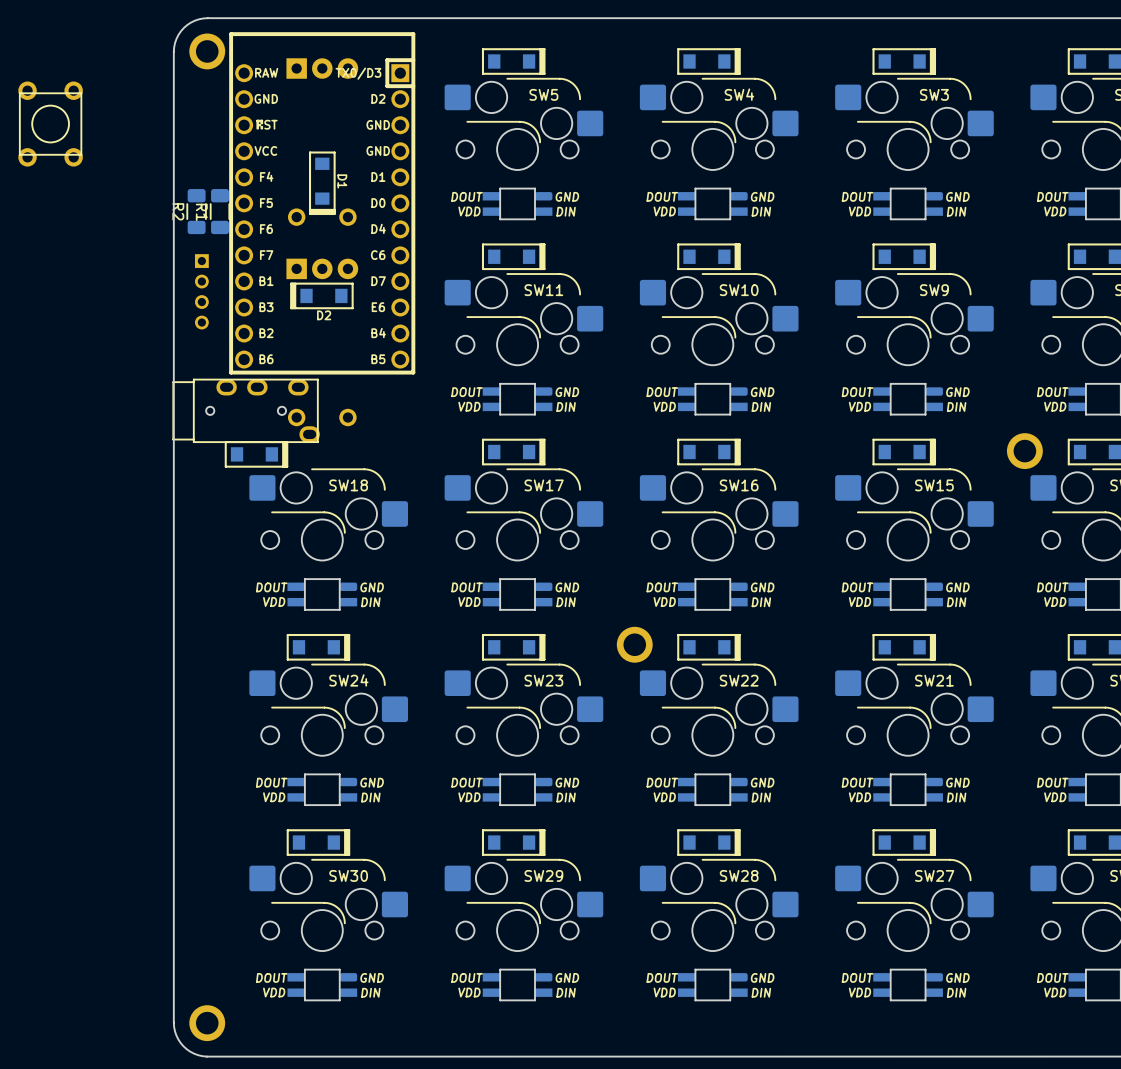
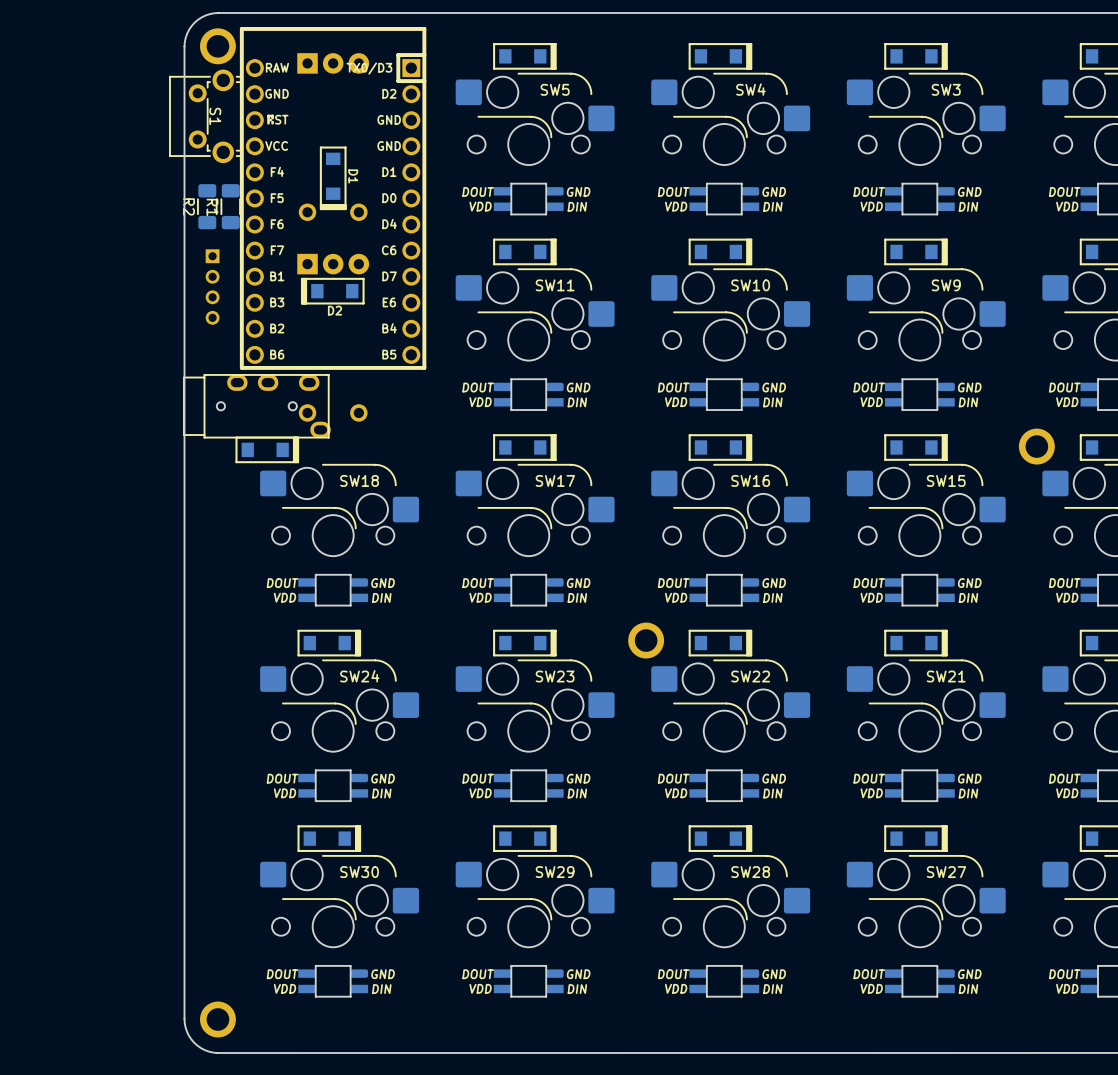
S1: none -> (205, 116)
part: (50, 124) -> none

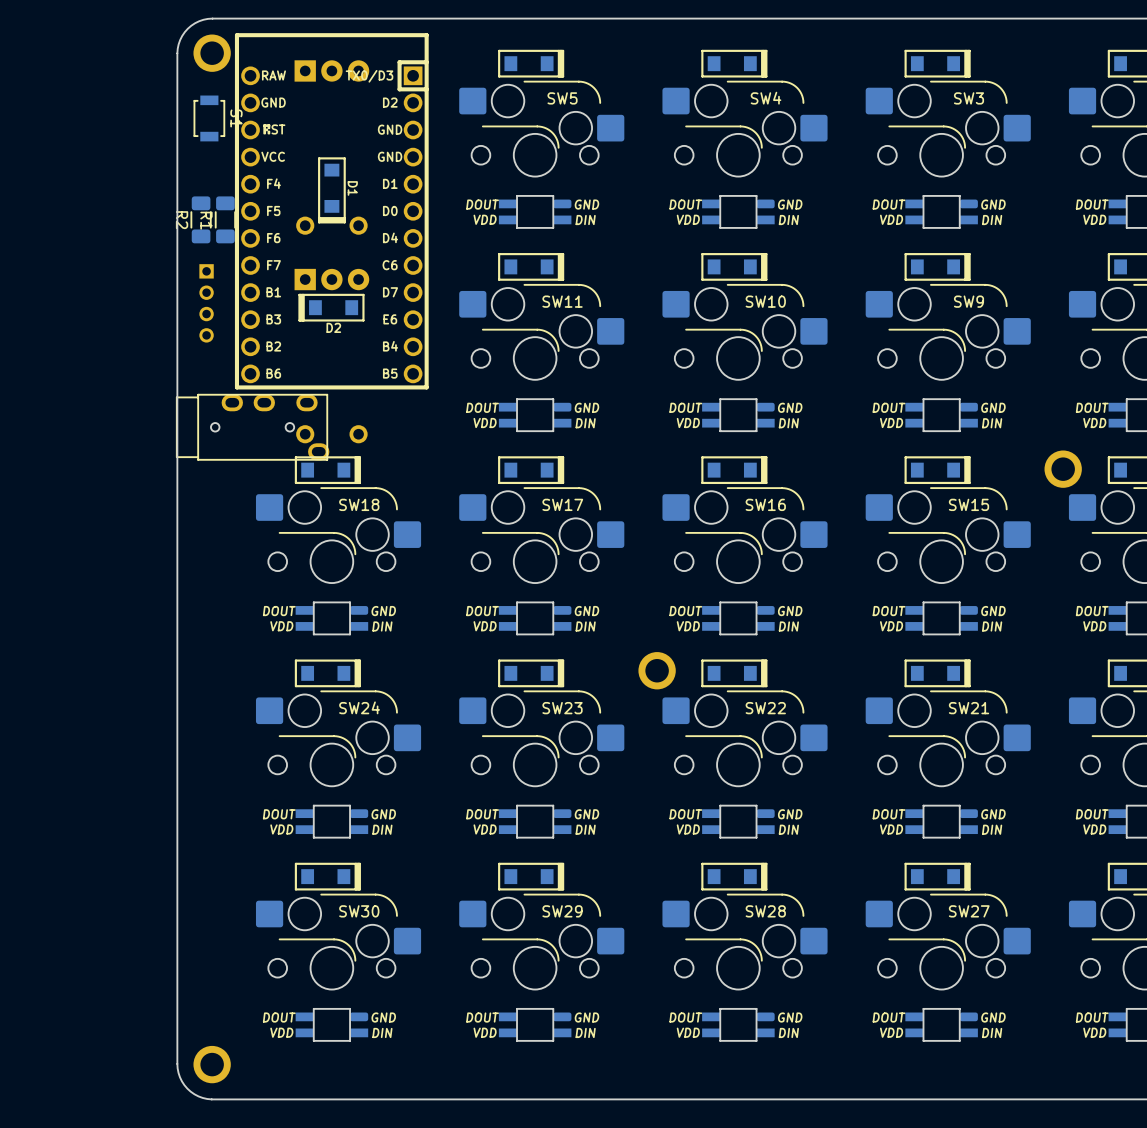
S1 footprint: [169, 69, 243, 164] -> [193, 95, 225, 142]
SW18 footprint: [235, 436, 420, 607] -> [255, 456, 422, 636]

